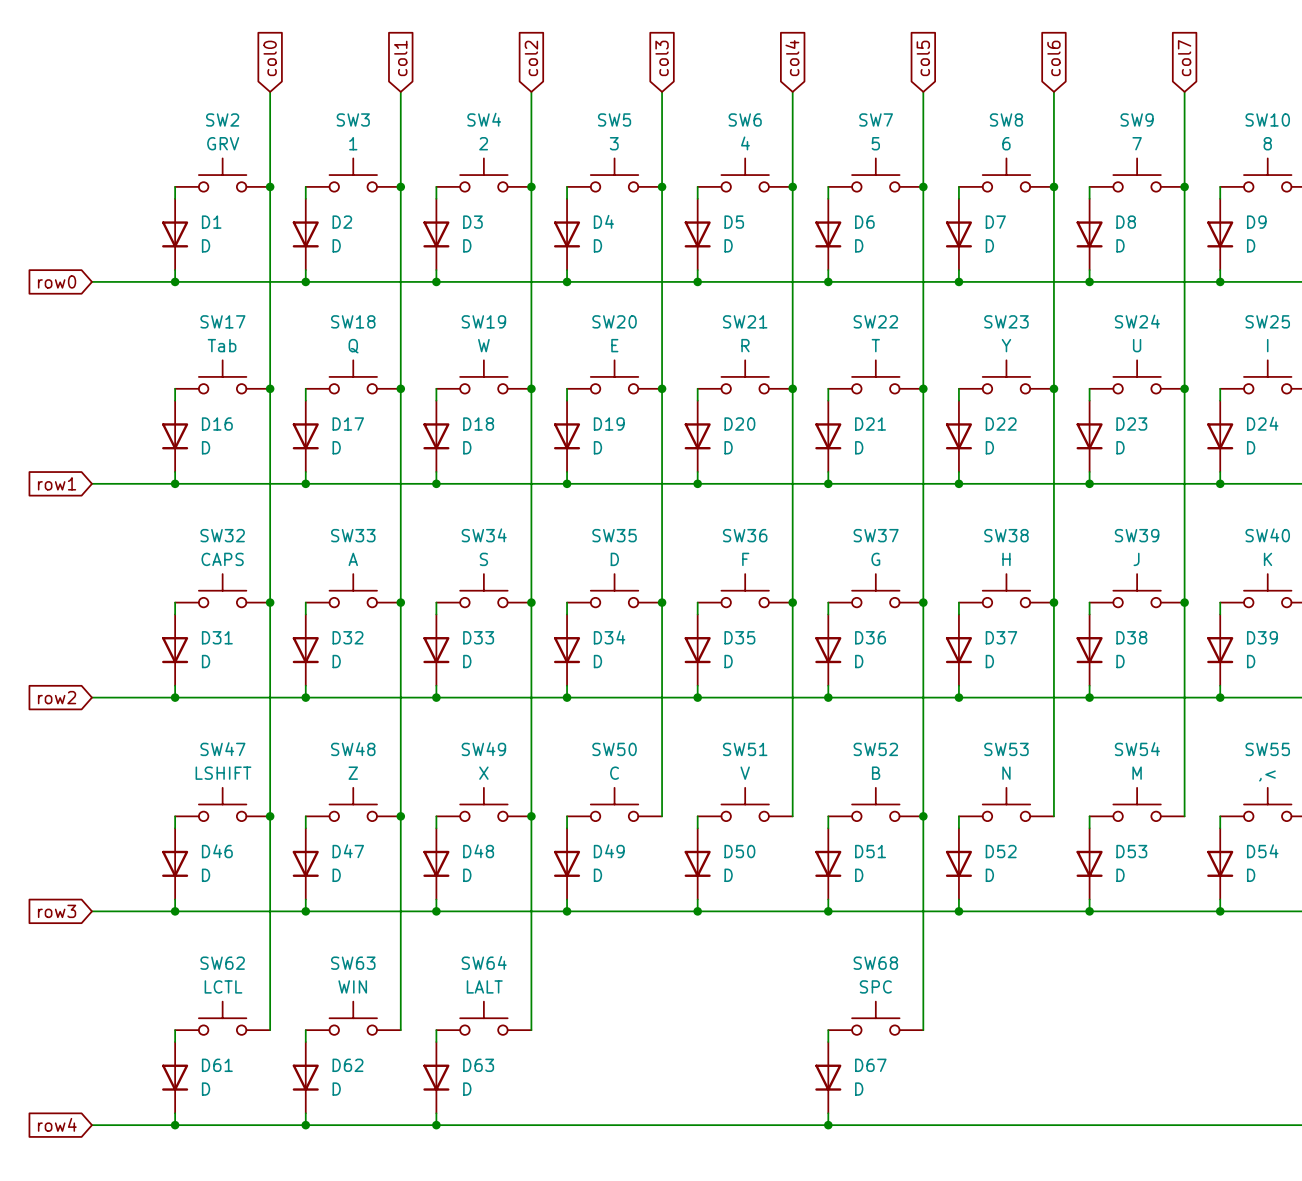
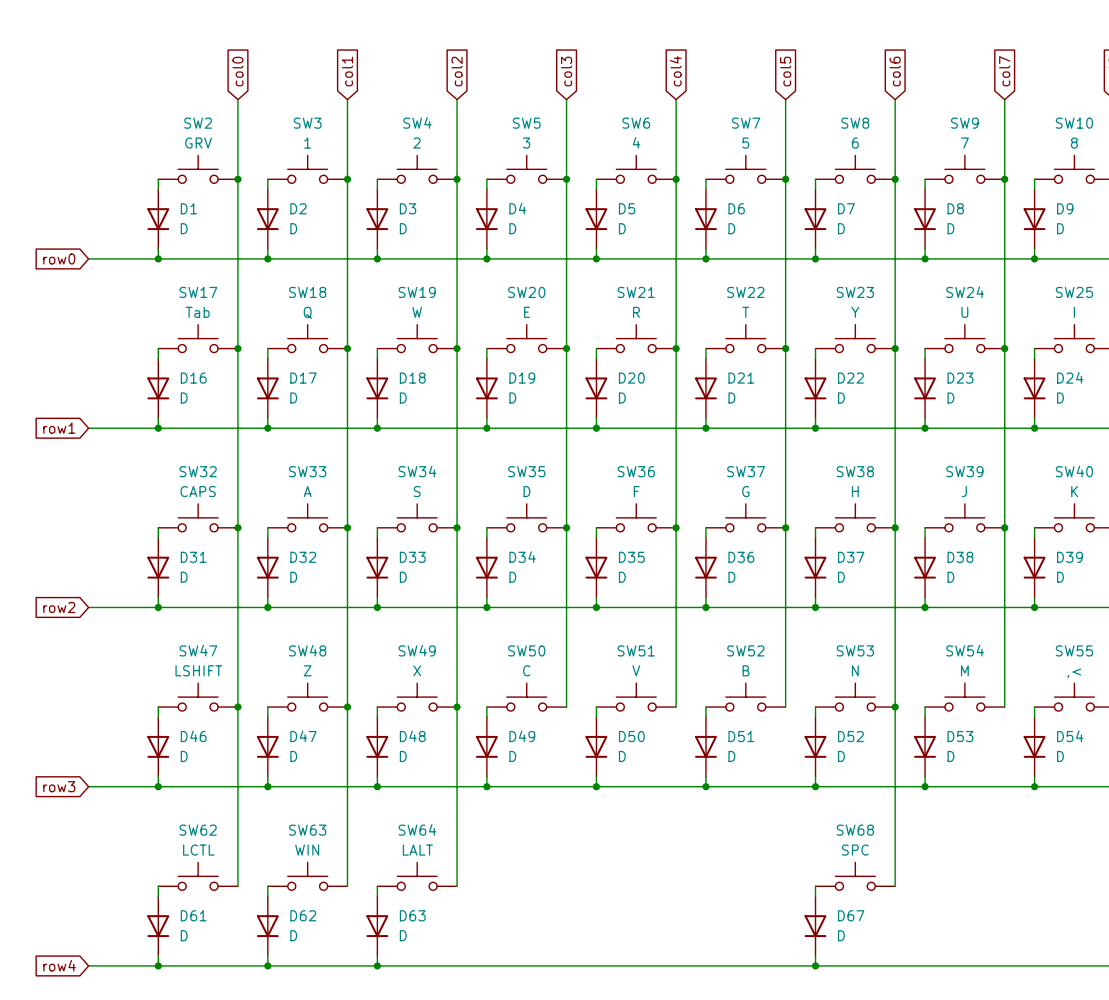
wire: (923, 816) (923, 1030) -> (895, 707) (895, 886)
junction: (923, 816) -> none
junction: none -> (895, 707)
SW68 position: (875, 1018) -> (855, 876)
wire: (828, 1030) (828, 1042) -> (815, 886) (815, 896)
D67 position: (828, 1077) -> (815, 926)
wire: (828, 1113) (828, 1125) -> (815, 955) (815, 965)
junction: (828, 1125) -> none
junction: none -> (815, 965)

